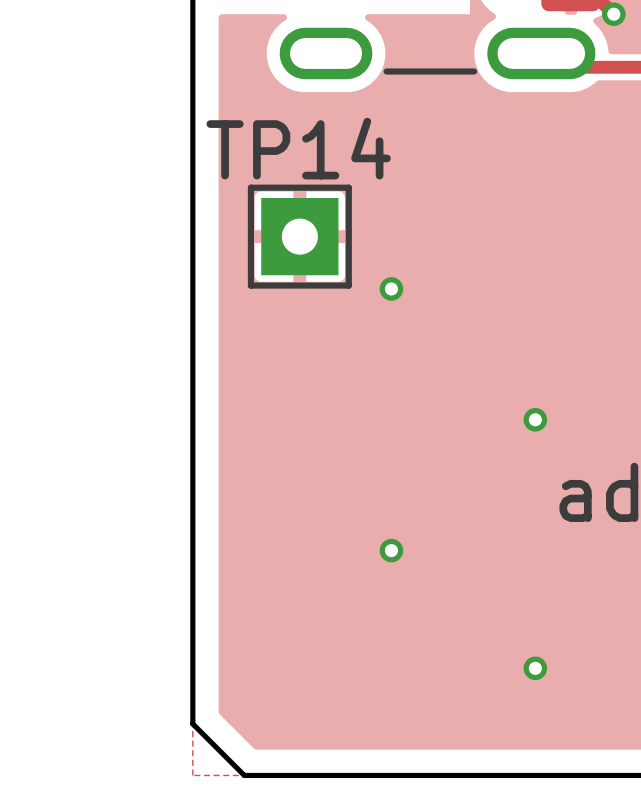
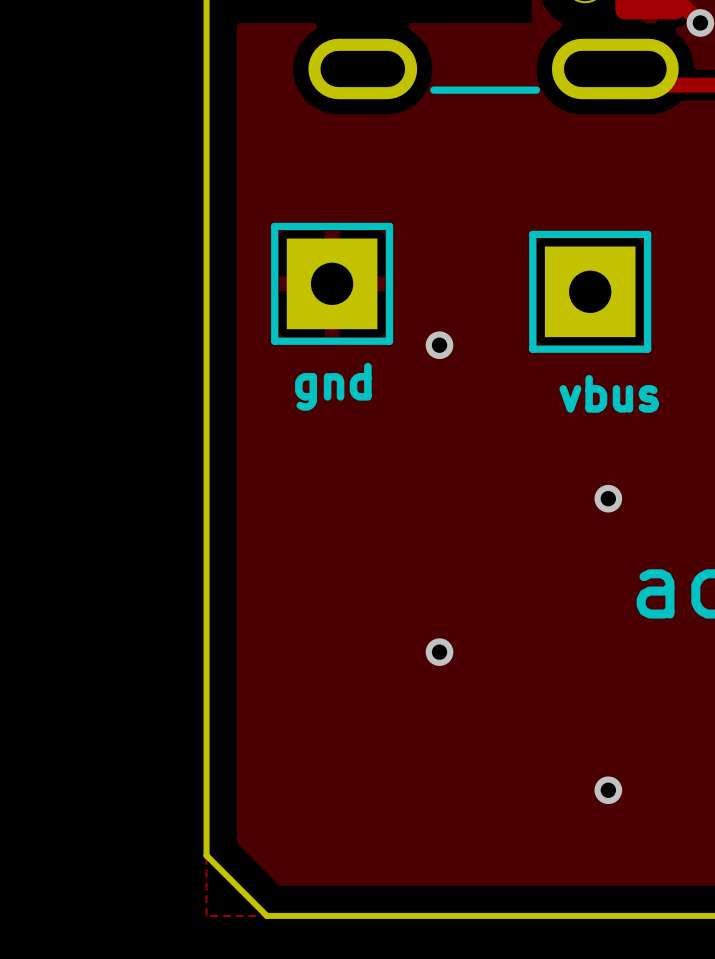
TP14 name: TP14 (298, 148) -> none
part: none -> (590, 291)
text: none -> gnd (333, 386)
text: none -> vbus (609, 393)

